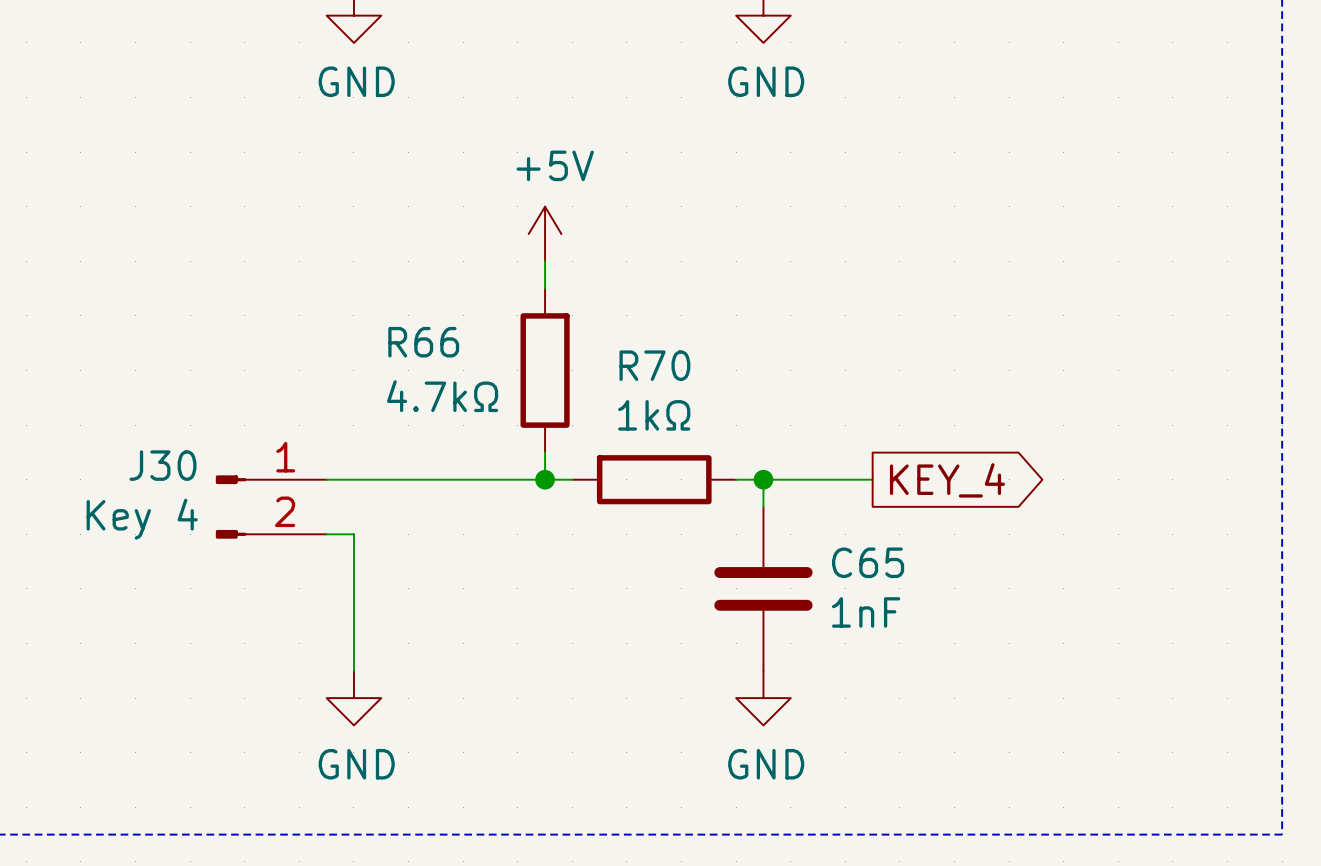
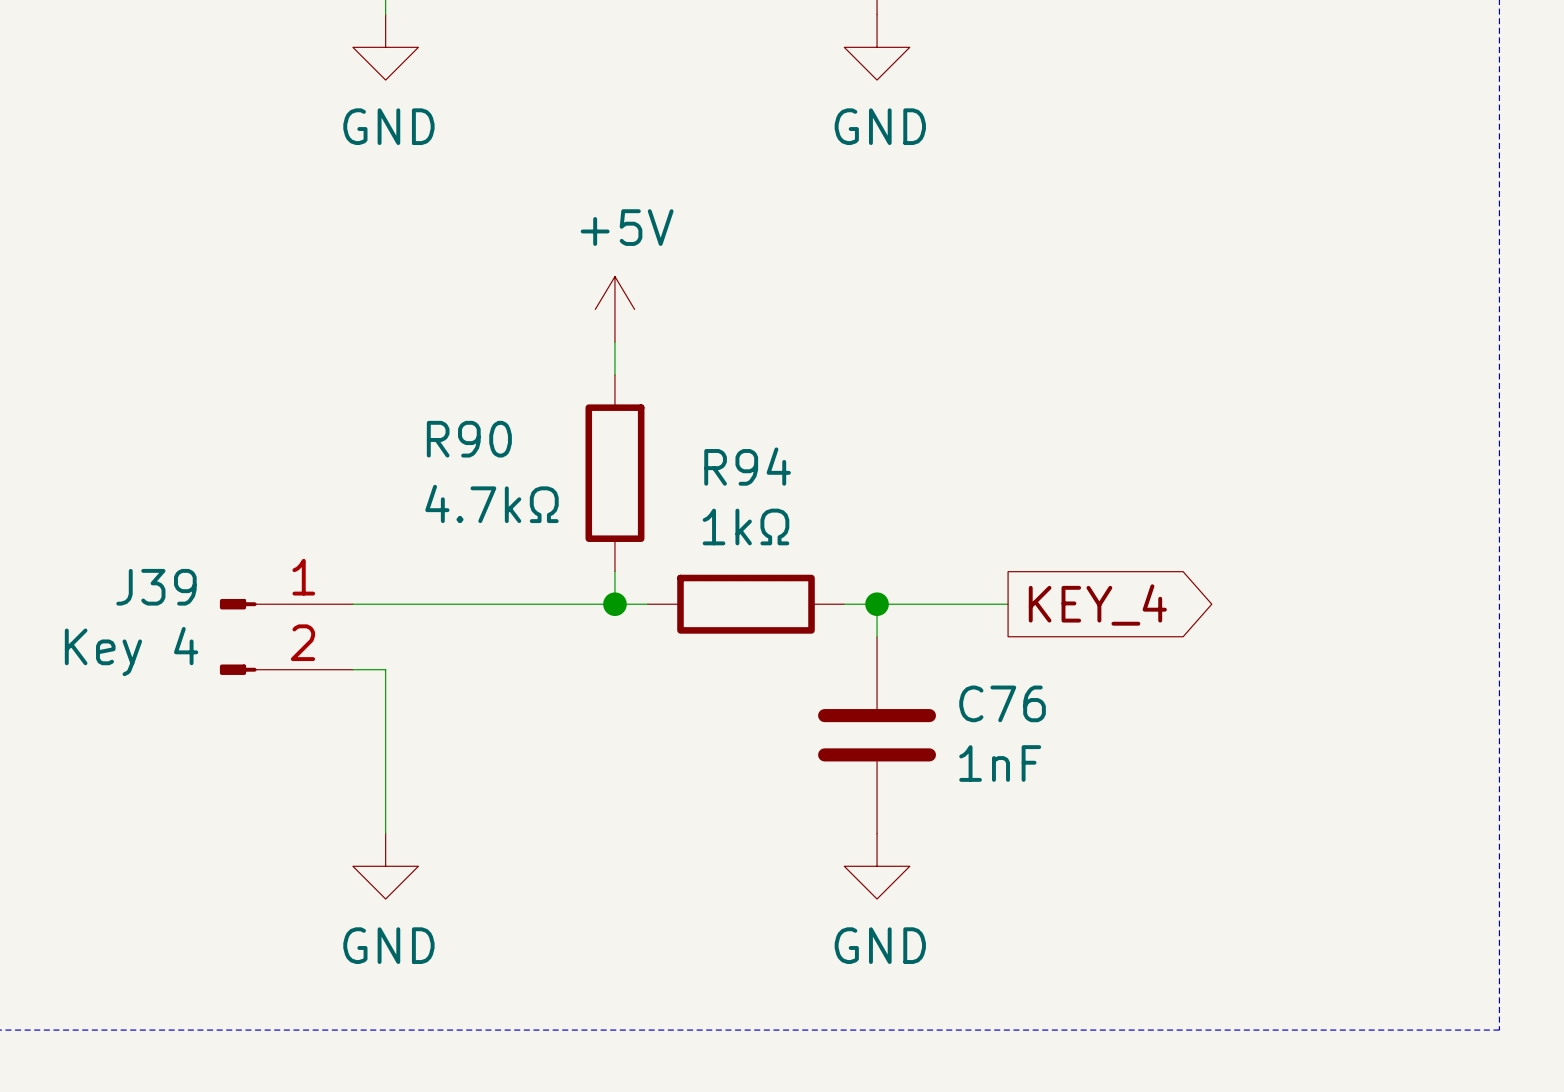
R66 name: R66 (423, 342) -> R90 (469, 439)
R70 name: R70 (654, 365) -> R94 (747, 466)
J30 name: J30 (162, 465) -> J39 (156, 587)
C65 name: C65 (868, 562) -> C76 (1002, 703)

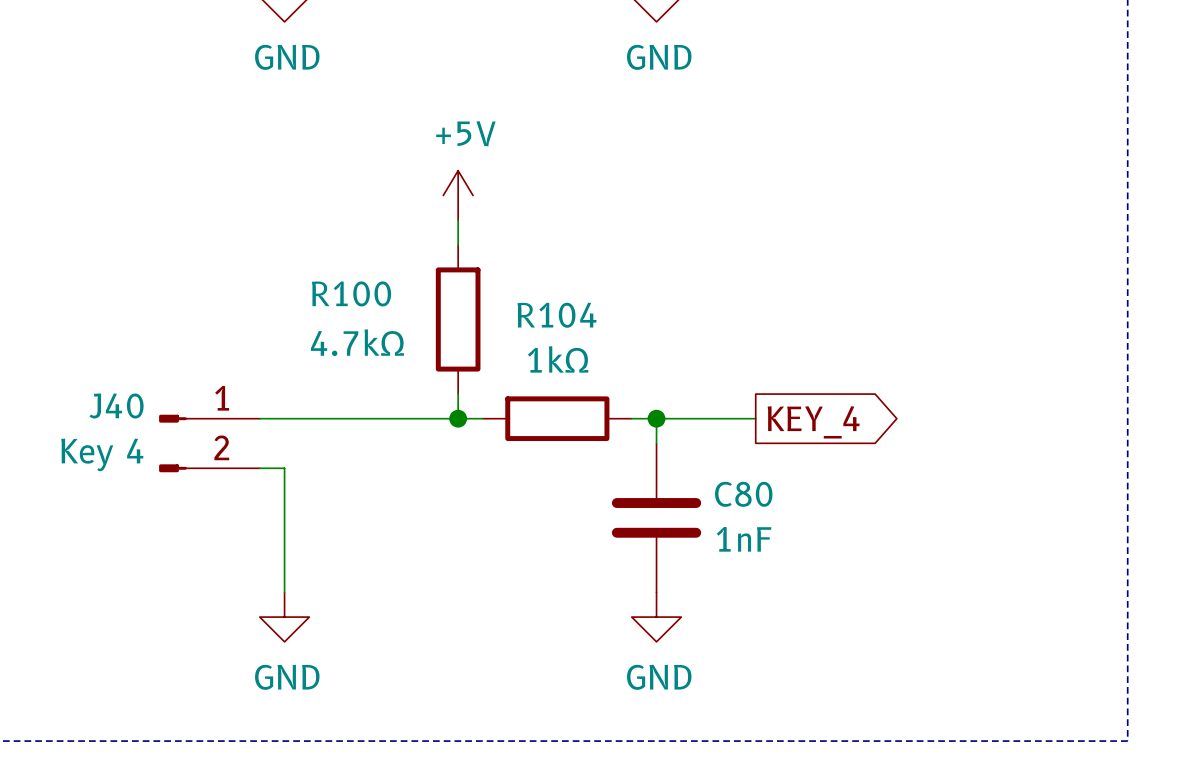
R90 name: R90 (469, 439) -> R100 (351, 293)
R94 name: R94 (747, 466) -> R104 (556, 315)
J39 name: J39 (156, 587) -> J40 (116, 406)
C76 name: C76 (1002, 703) -> C80 (743, 494)

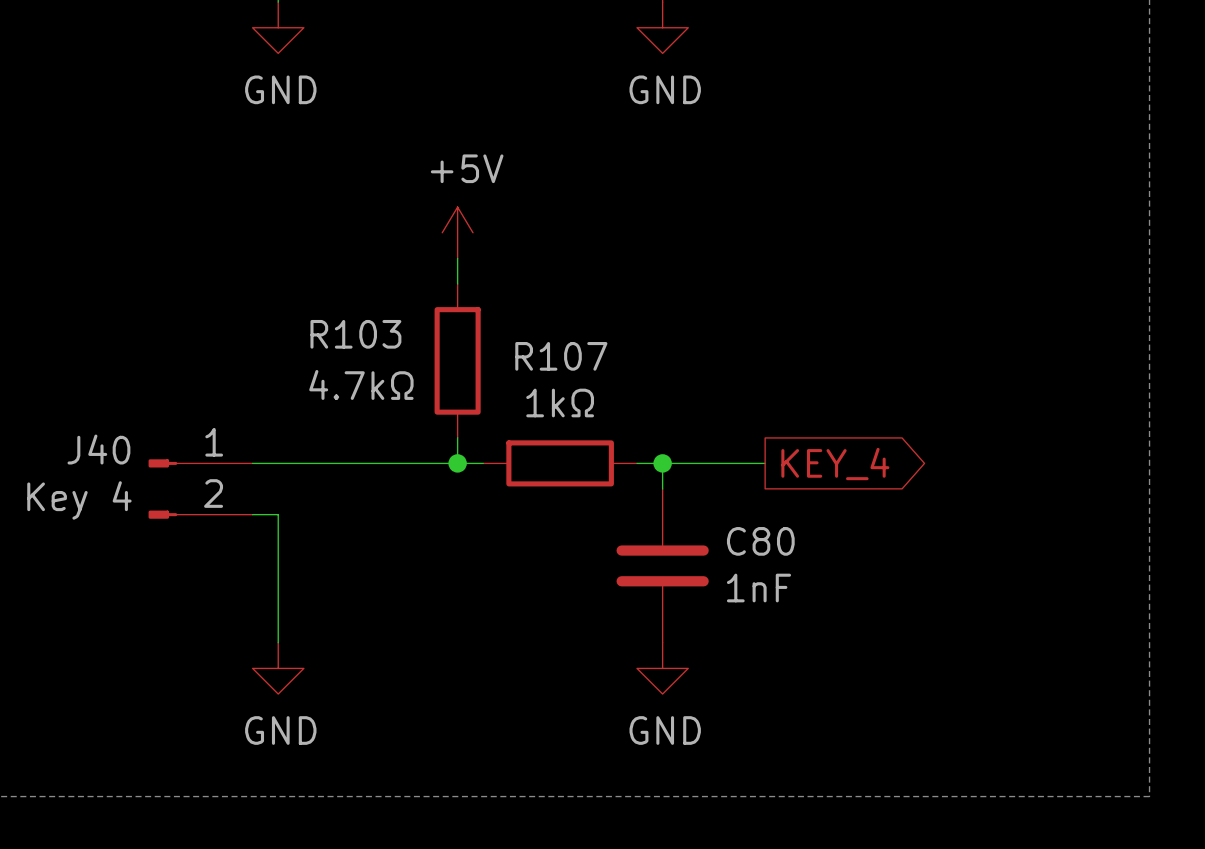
R100 name: R100 (351, 293) -> R103 (355, 334)
R104 name: R104 (556, 315) -> R107 (561, 356)

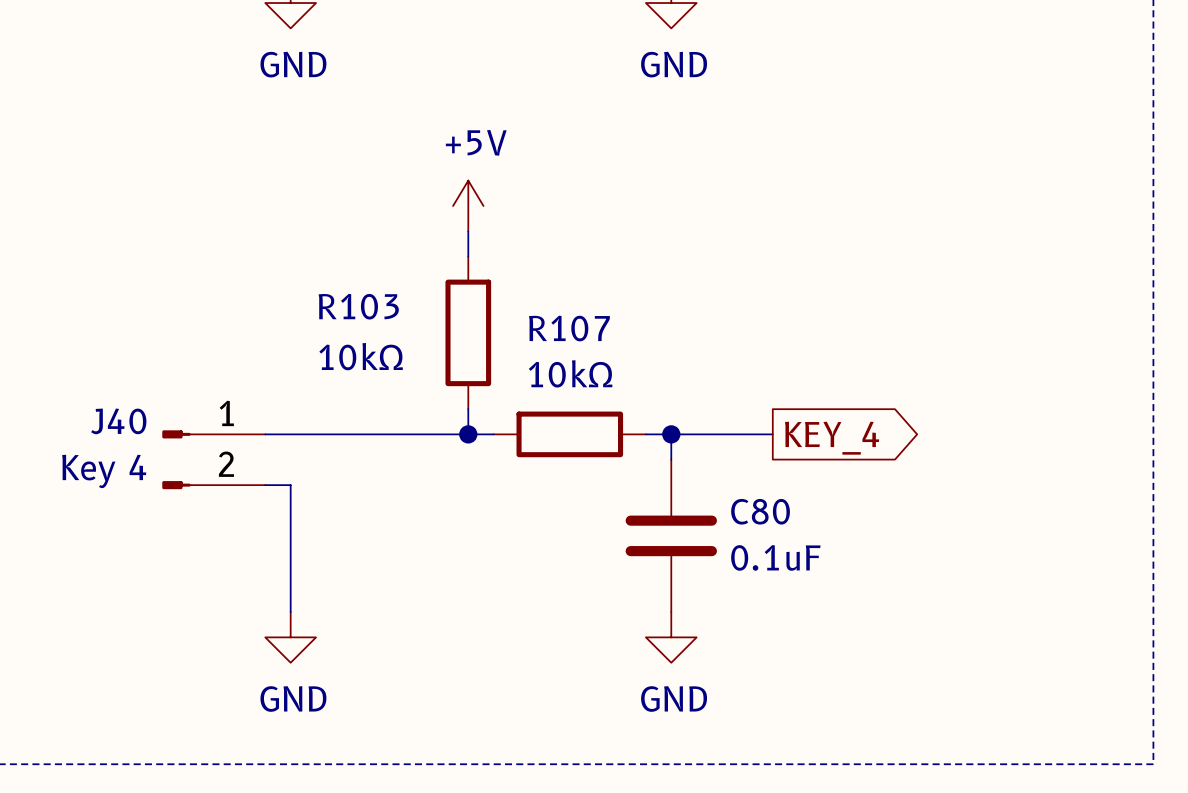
R103 value: 4.7kΩ (361, 384) -> 10kΩ (361, 356)
R107 value: 1kΩ (560, 402) -> 10kΩ (570, 373)
C80 value: 1nF (758, 588) -> 0.1uF (775, 557)

